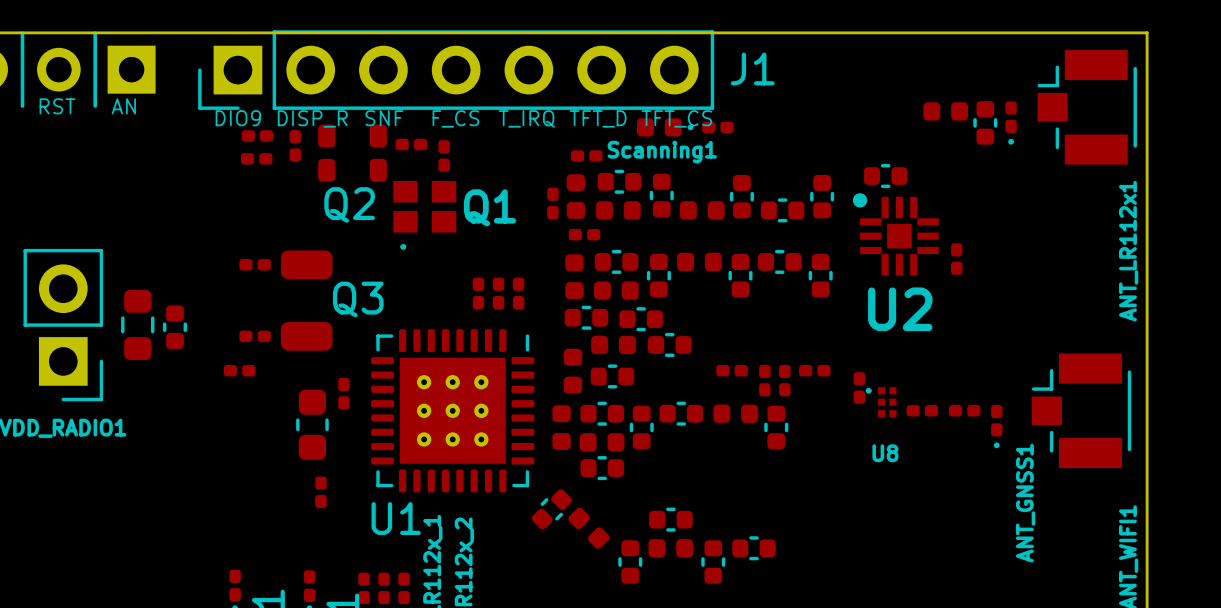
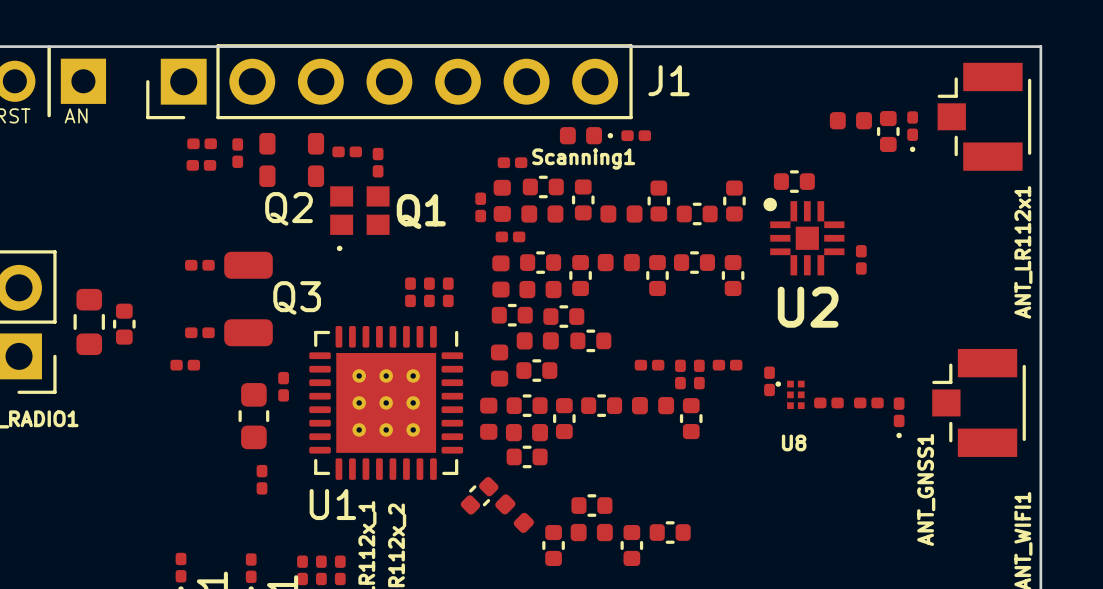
text: DIO9 (238, 118) -> none
text: DISP_R (312, 118) -> none
text: SNF (384, 118) -> none
text: F_CS (455, 118) -> none
text: T_IRQ (526, 118) -> none
text: TFT_D (598, 118) -> none
text: TFT_CS (676, 118) -> none

